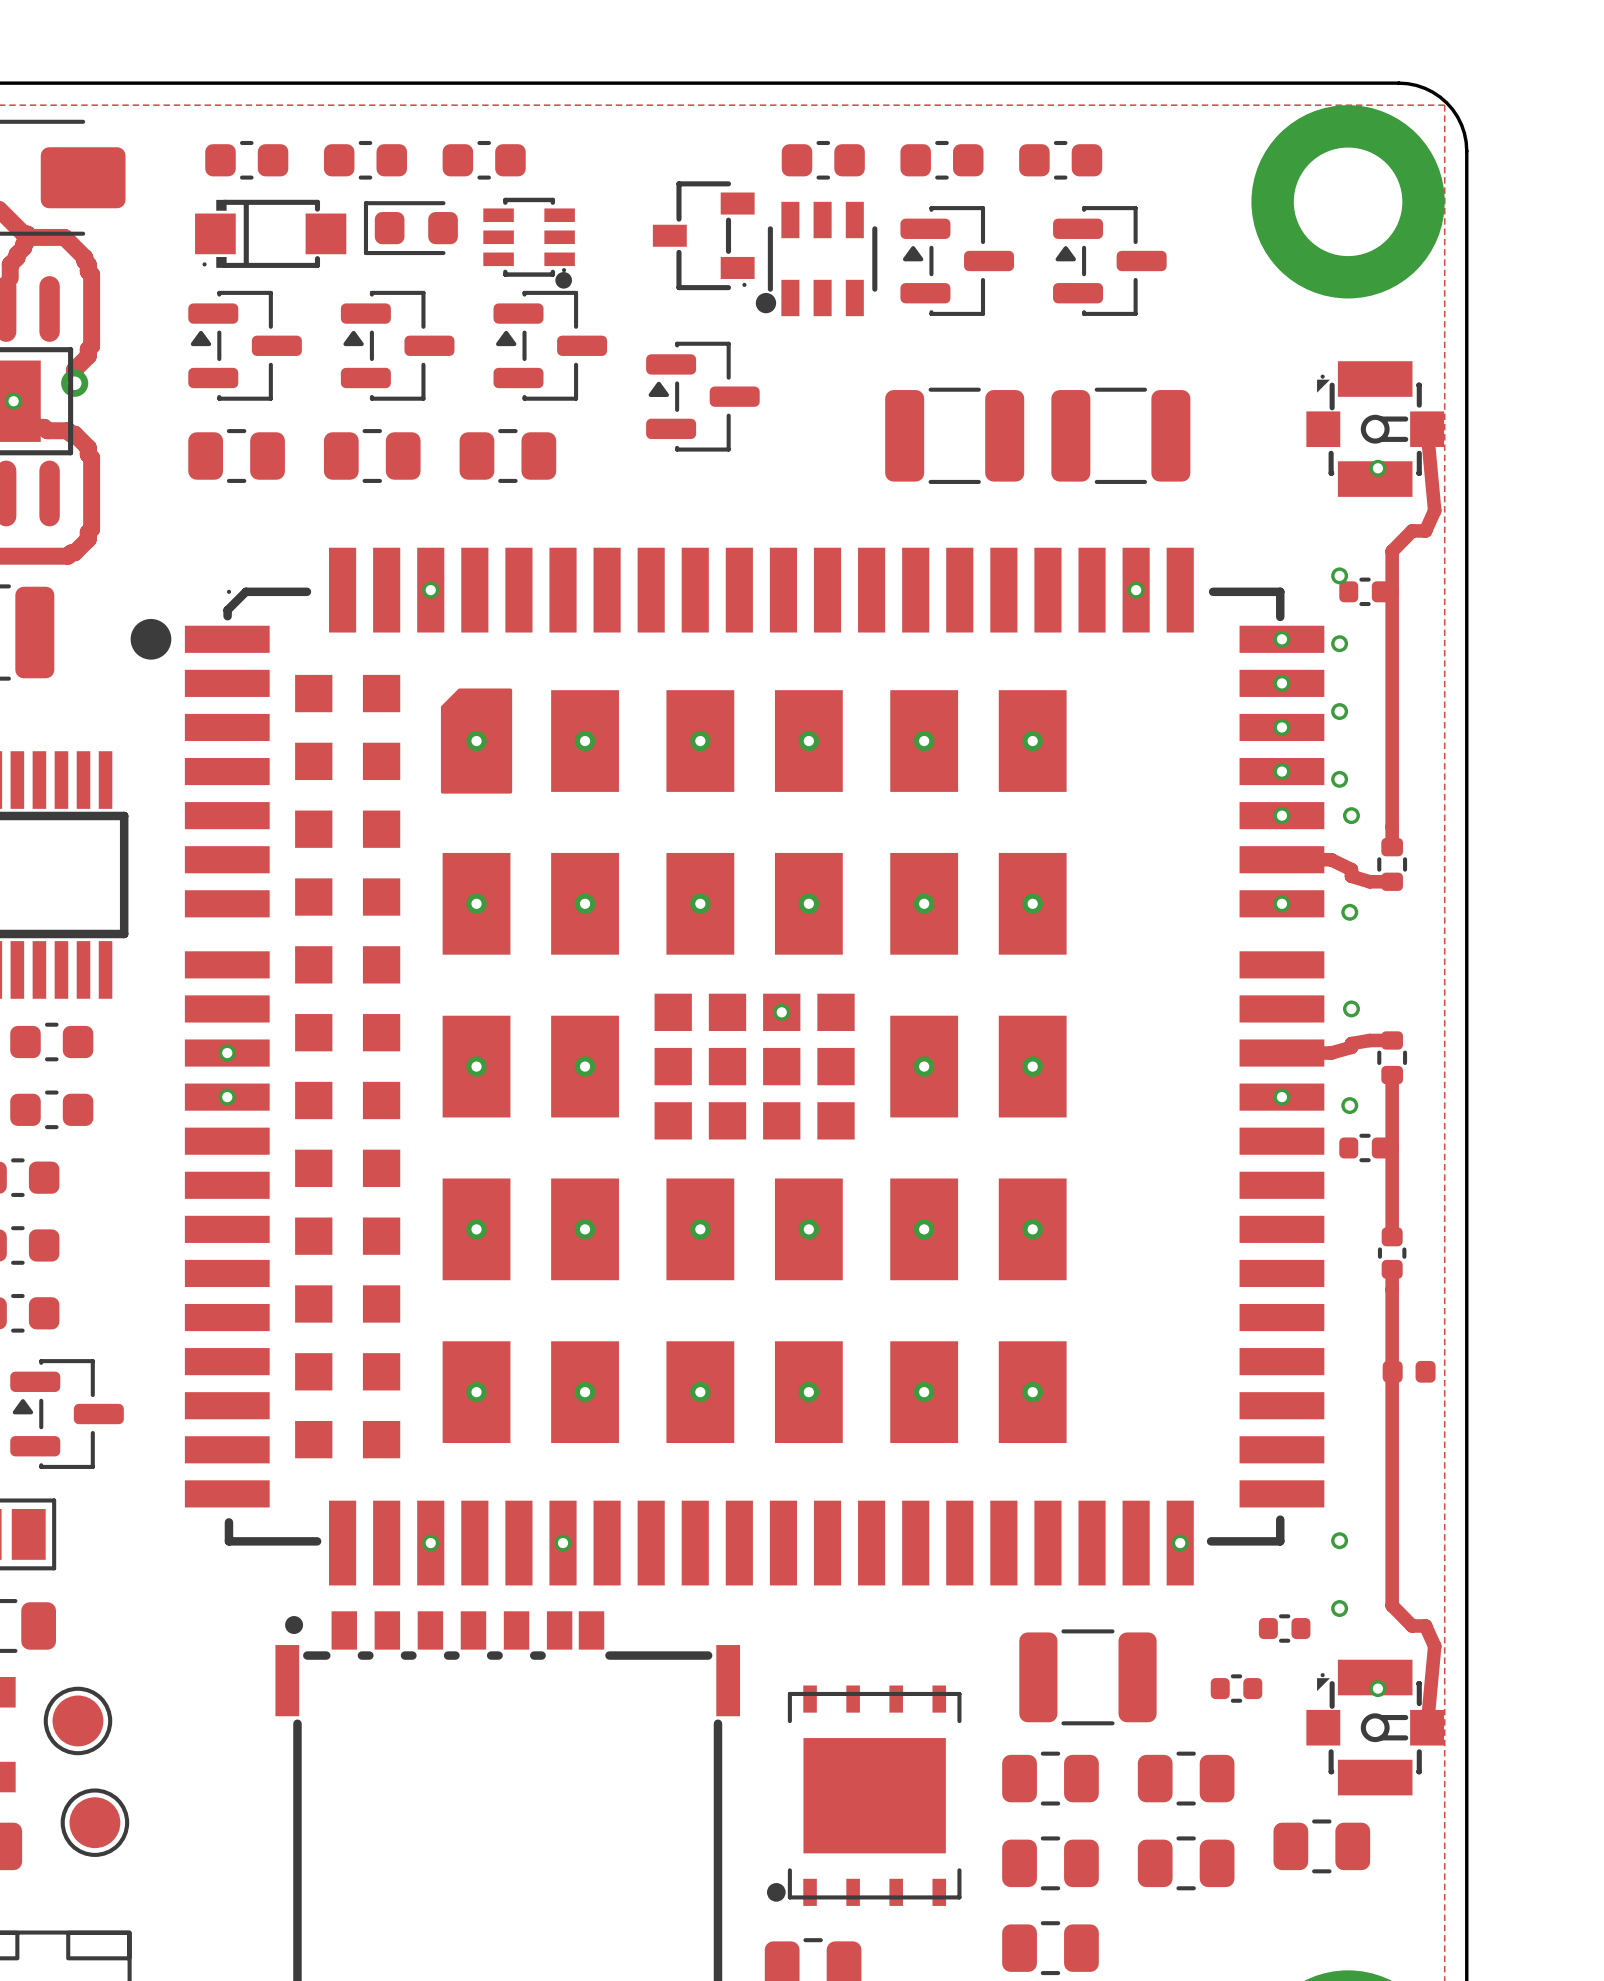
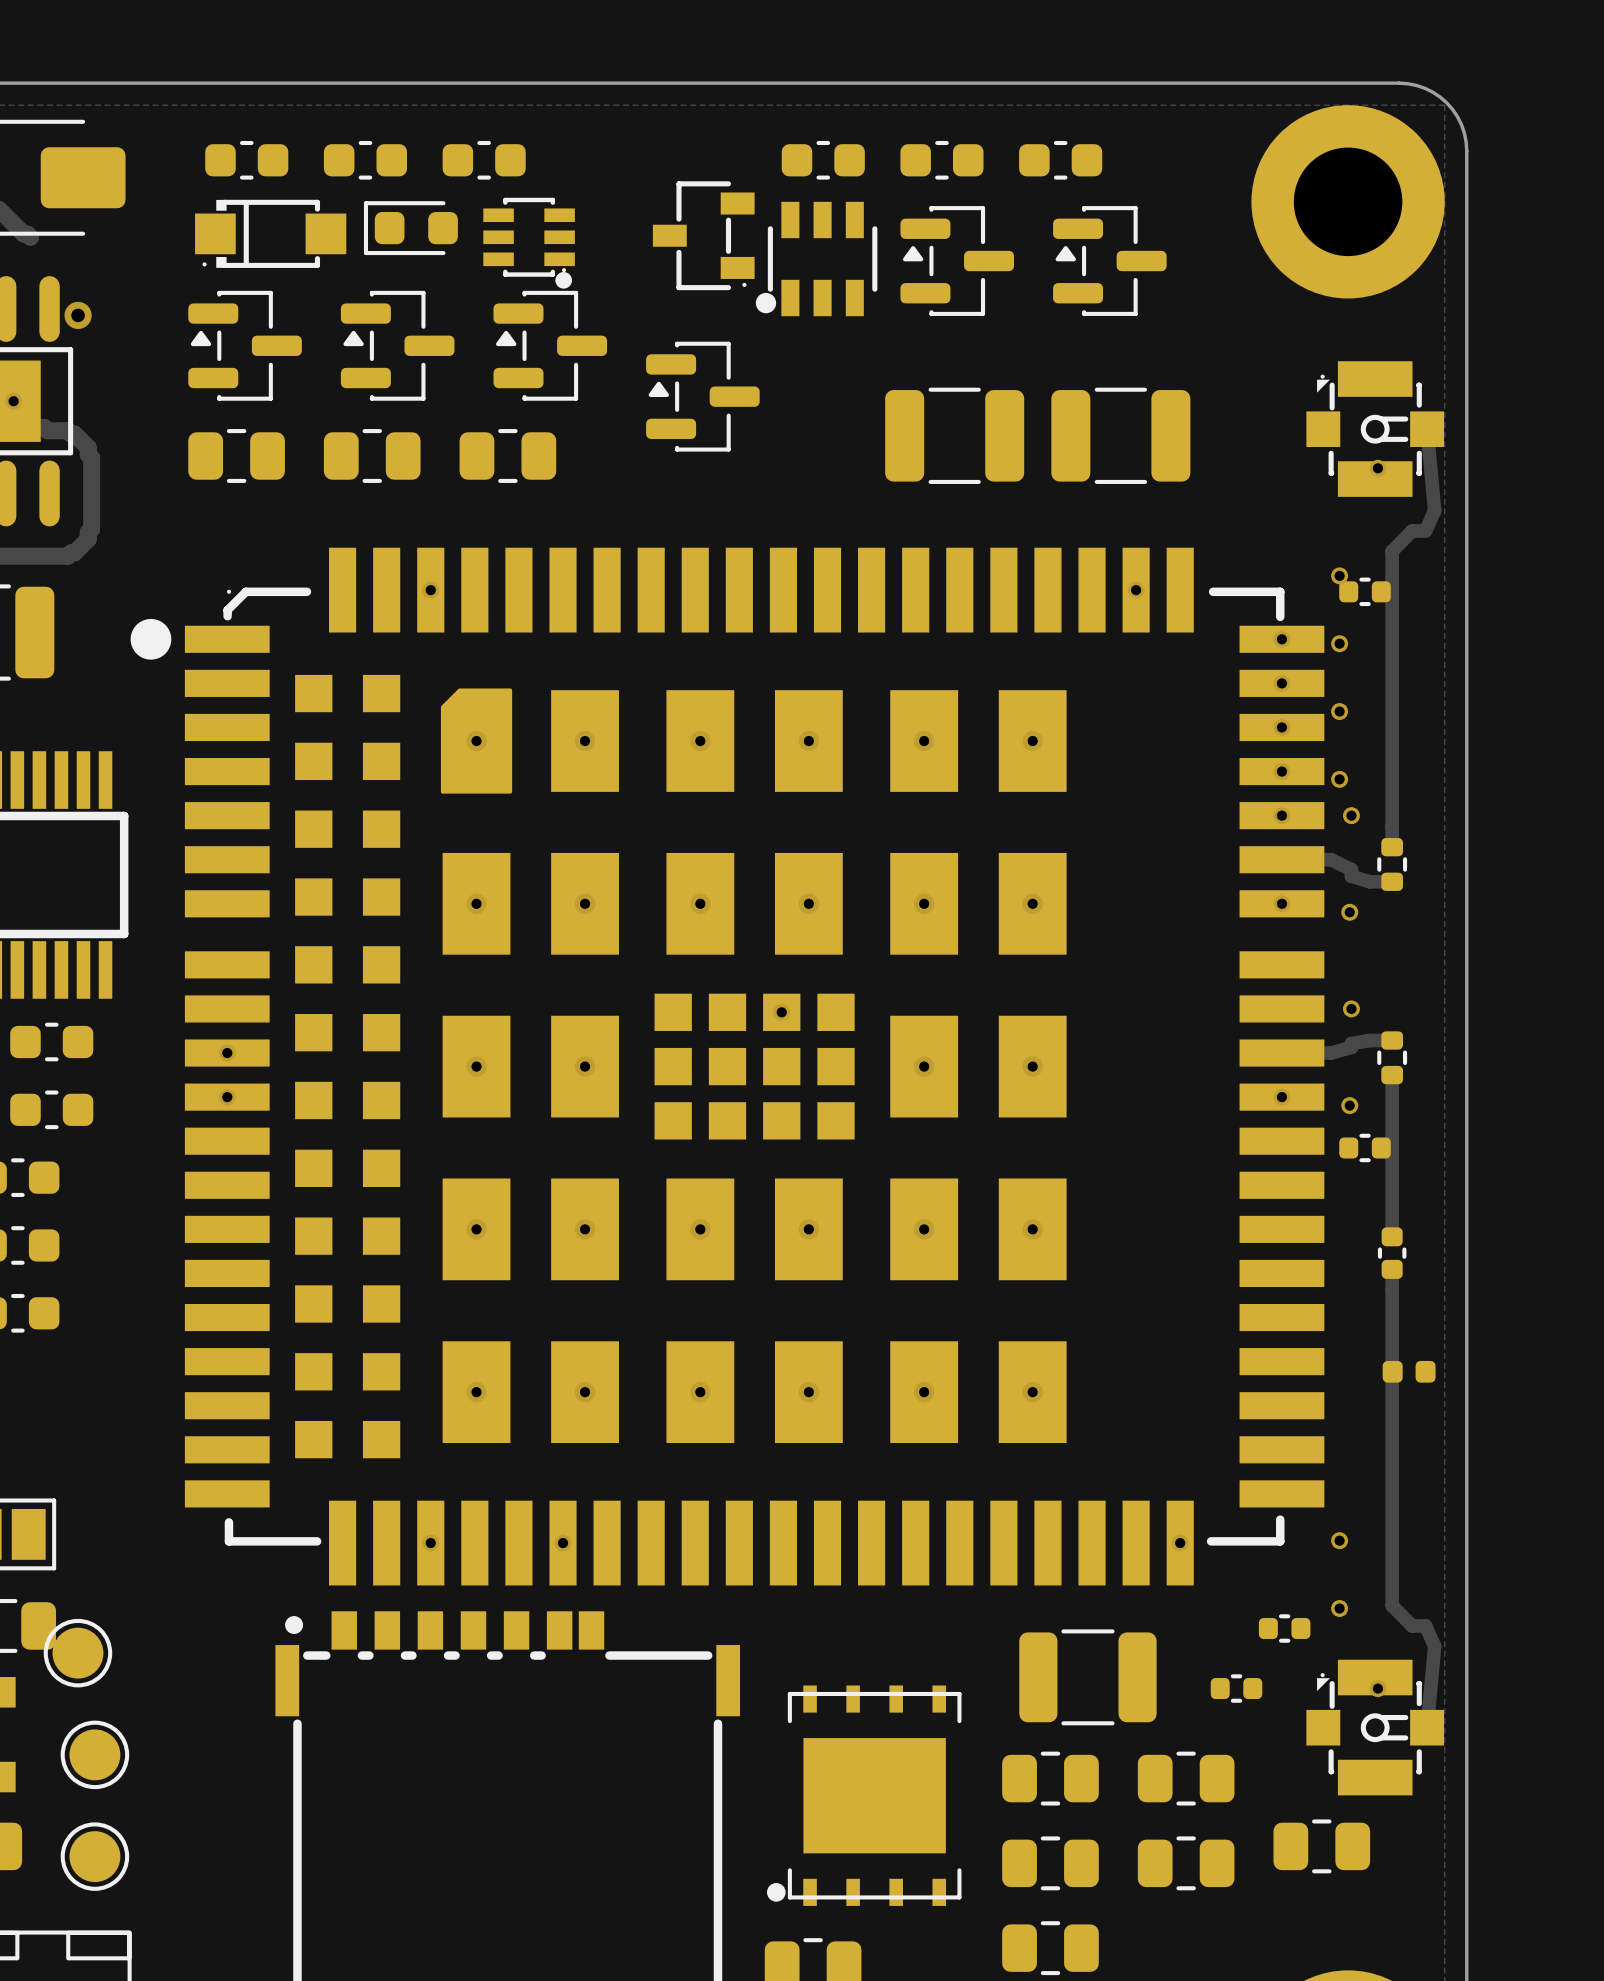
track: (10, 278) (10, 264) (30, 237) (64, 237) (84, 257) (84, 261) (88, 264) (88, 271) (91, 274) (91, 345) (88, 349) (88, 356) (74, 369) (74, 383) -> none
via position: (74, 383) -> (78, 315)
part: (67, 1414) -> none
part: none -> (77, 1653)
part: (77, 1720) -> none
part: none -> (94, 1754)
part: (94, 1822) -> none
part: none -> (94, 1856)

